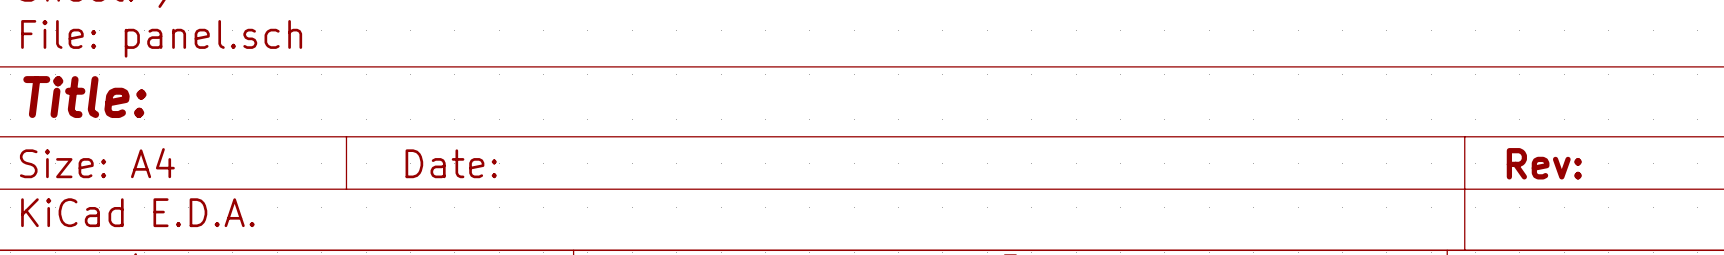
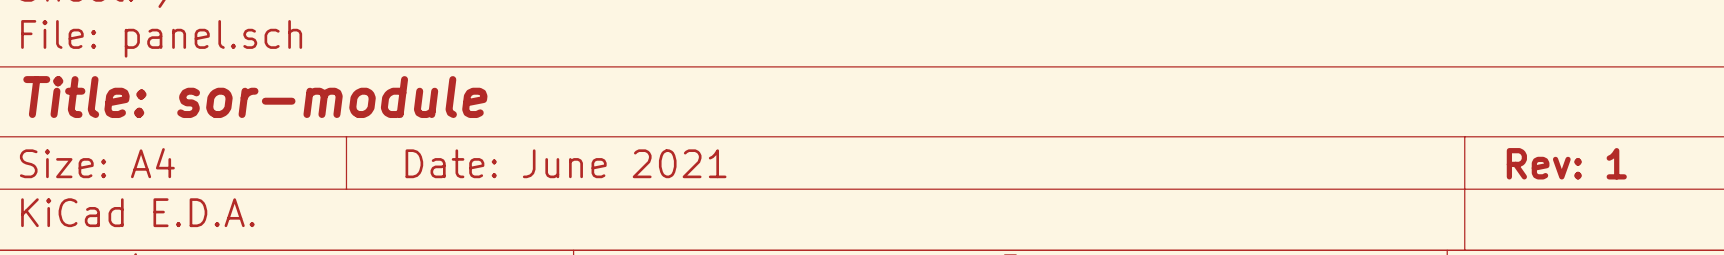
title block: Title: (84, 97) -> Title: sor-module (255, 97)
title block: Date: (451, 163) -> Date: June 2021 (566, 163)
title block: Rev: (1544, 163) -> Rev: 1 (1566, 163)

